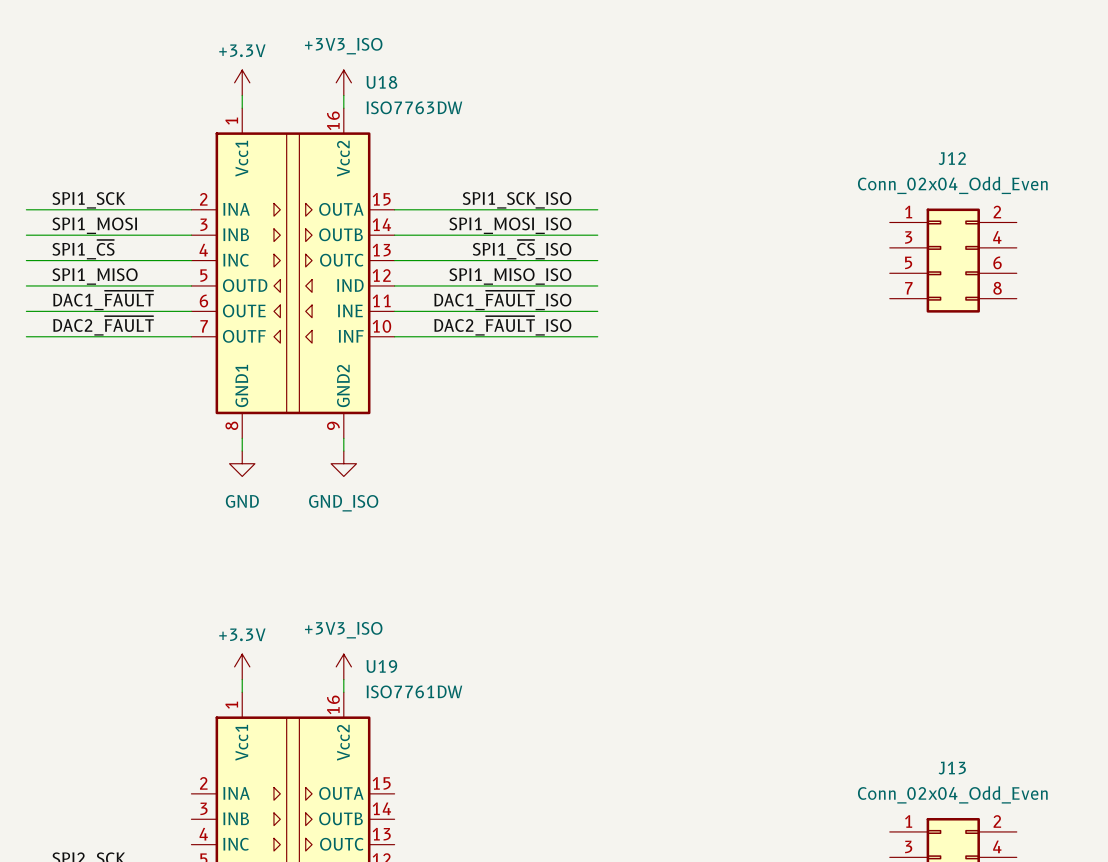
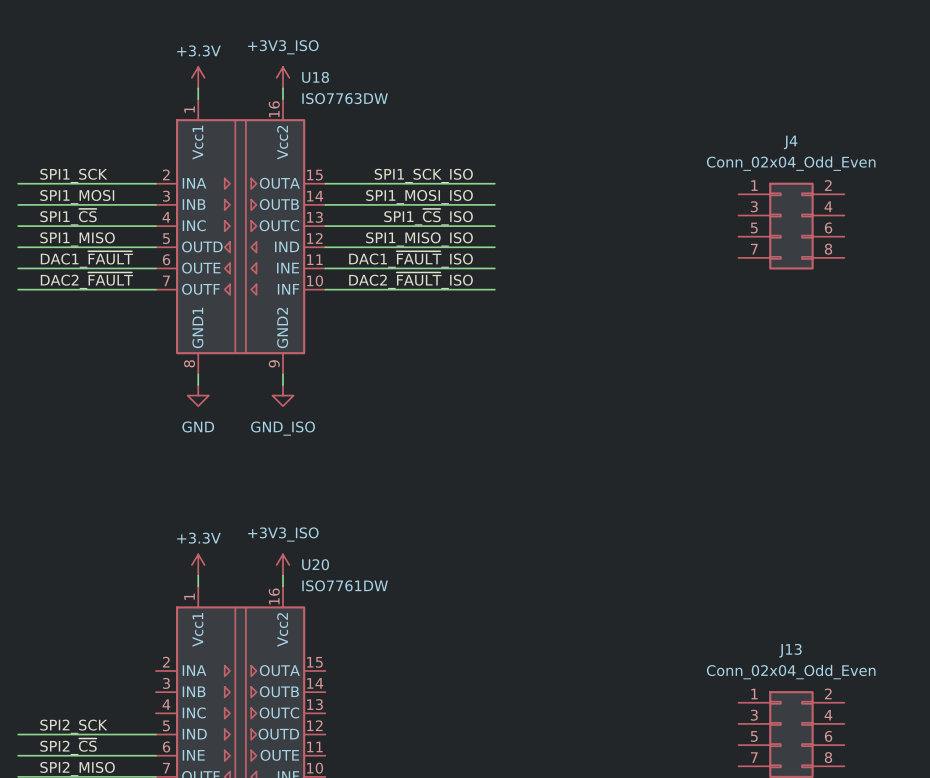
J12 name: J12 (952, 158) -> J4 (790, 142)
U19 name: U19 (381, 666) -> U20 (315, 564)

